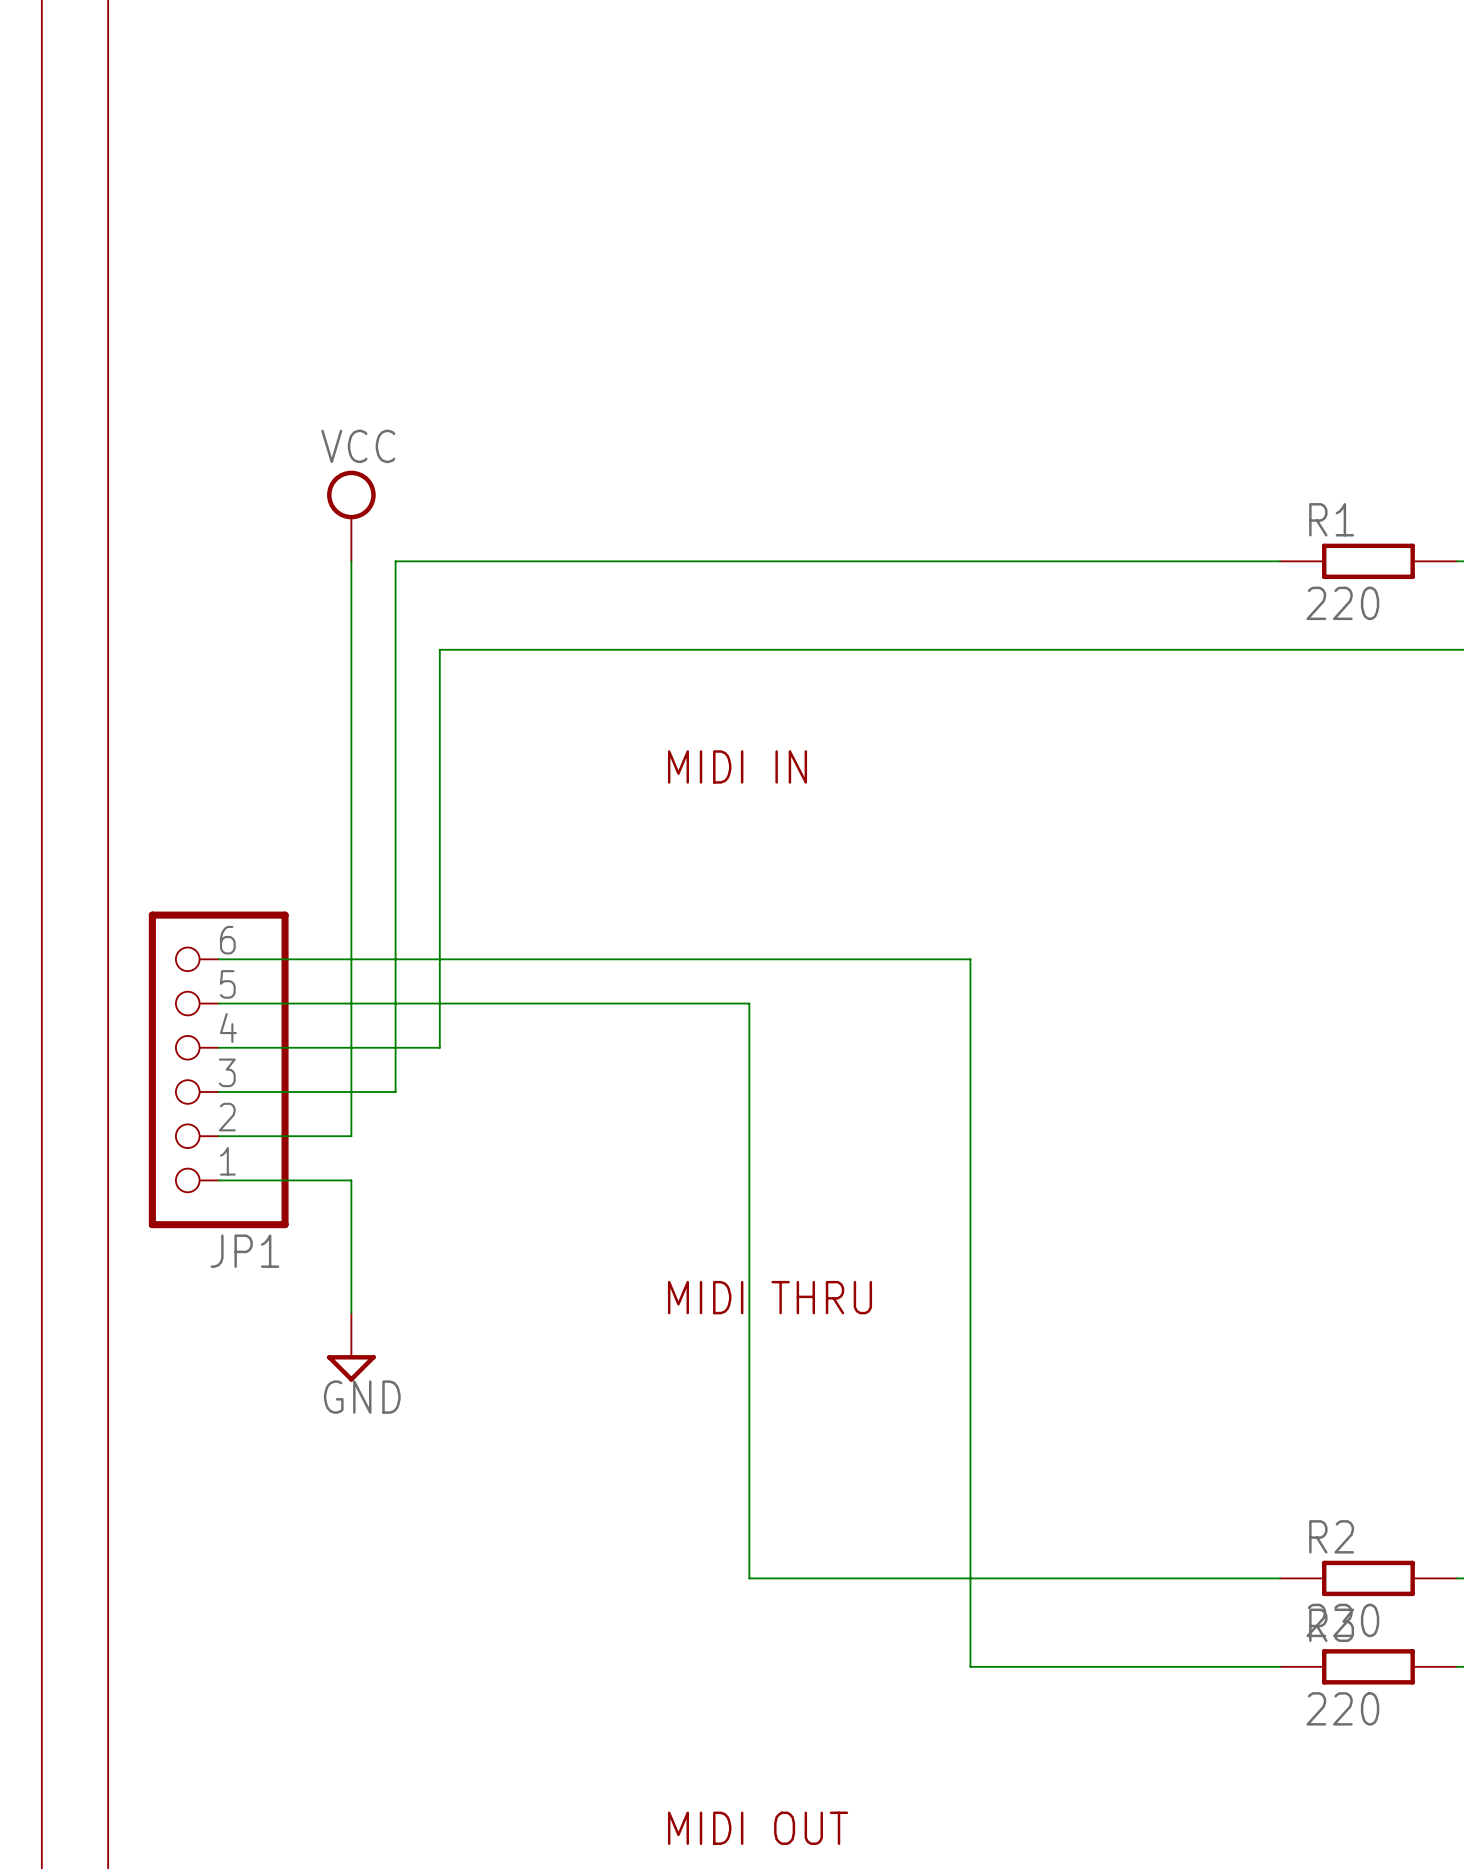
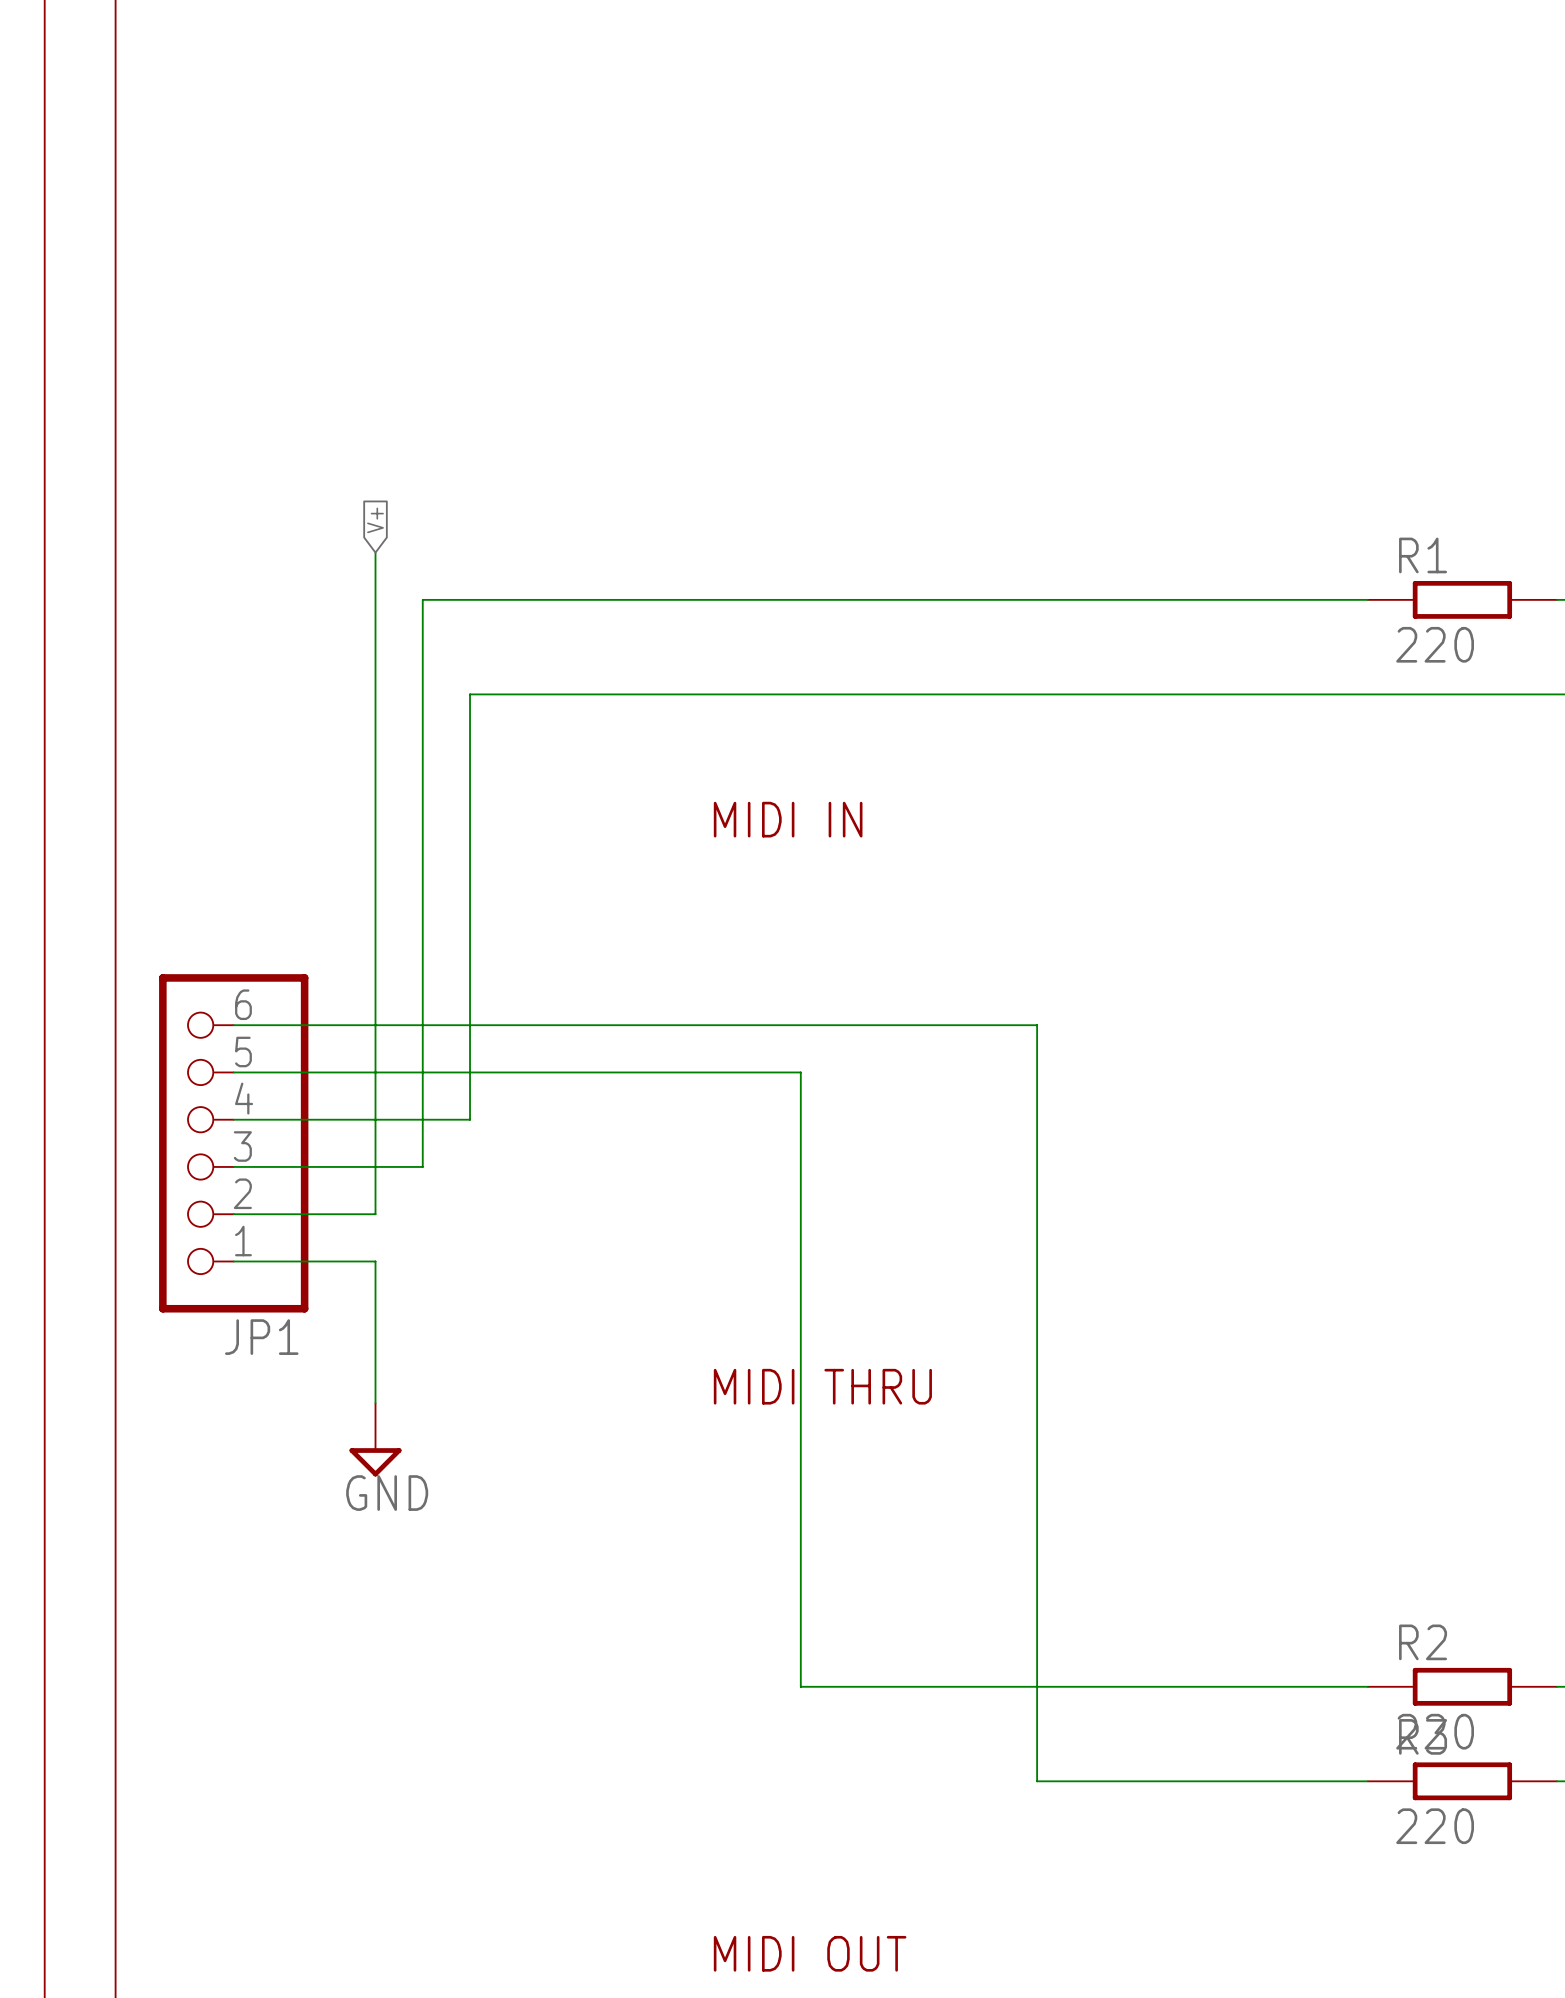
global label: none -> V+ (375, 520)
power symbol: VCC (351, 516) -> none

